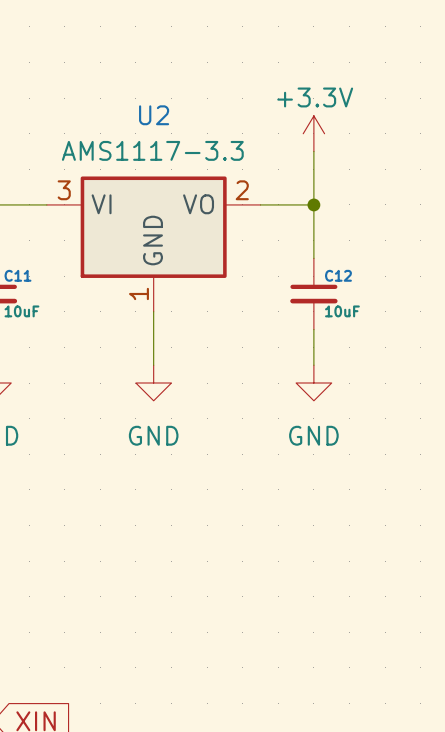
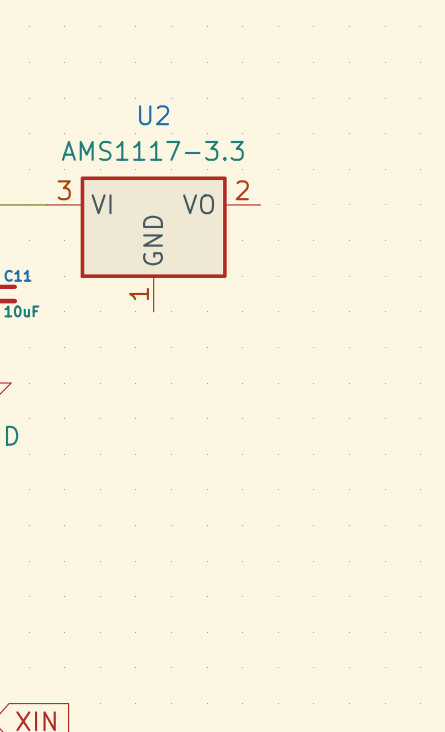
power symbol: +3.3V (313, 133) -> none
wire: (313, 151) (313, 258) -> none
wire: (260, 204) (313, 204) -> none
junction: (313, 204) -> none
C12: 10uF (313, 293) -> none
wire: (153, 311) (153, 365) -> none
wire: (313, 329) (313, 365) -> none
power symbol: GND (153, 383) -> none
power symbol: GND (313, 383) -> none

